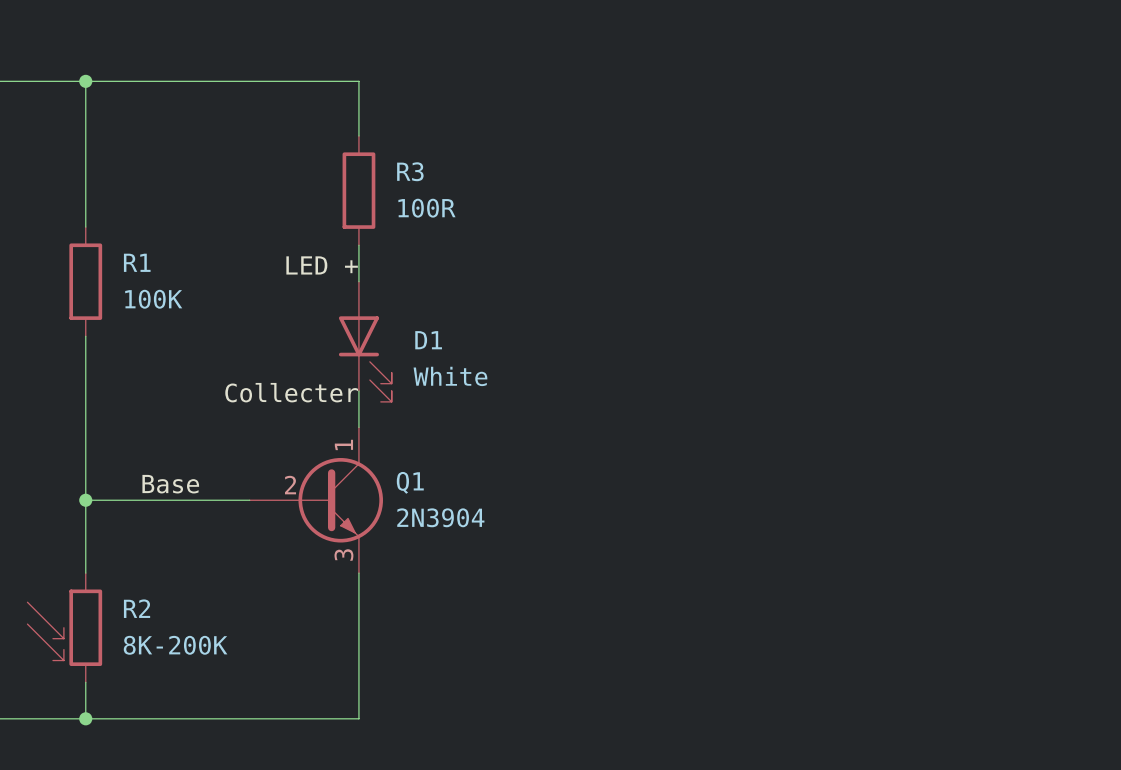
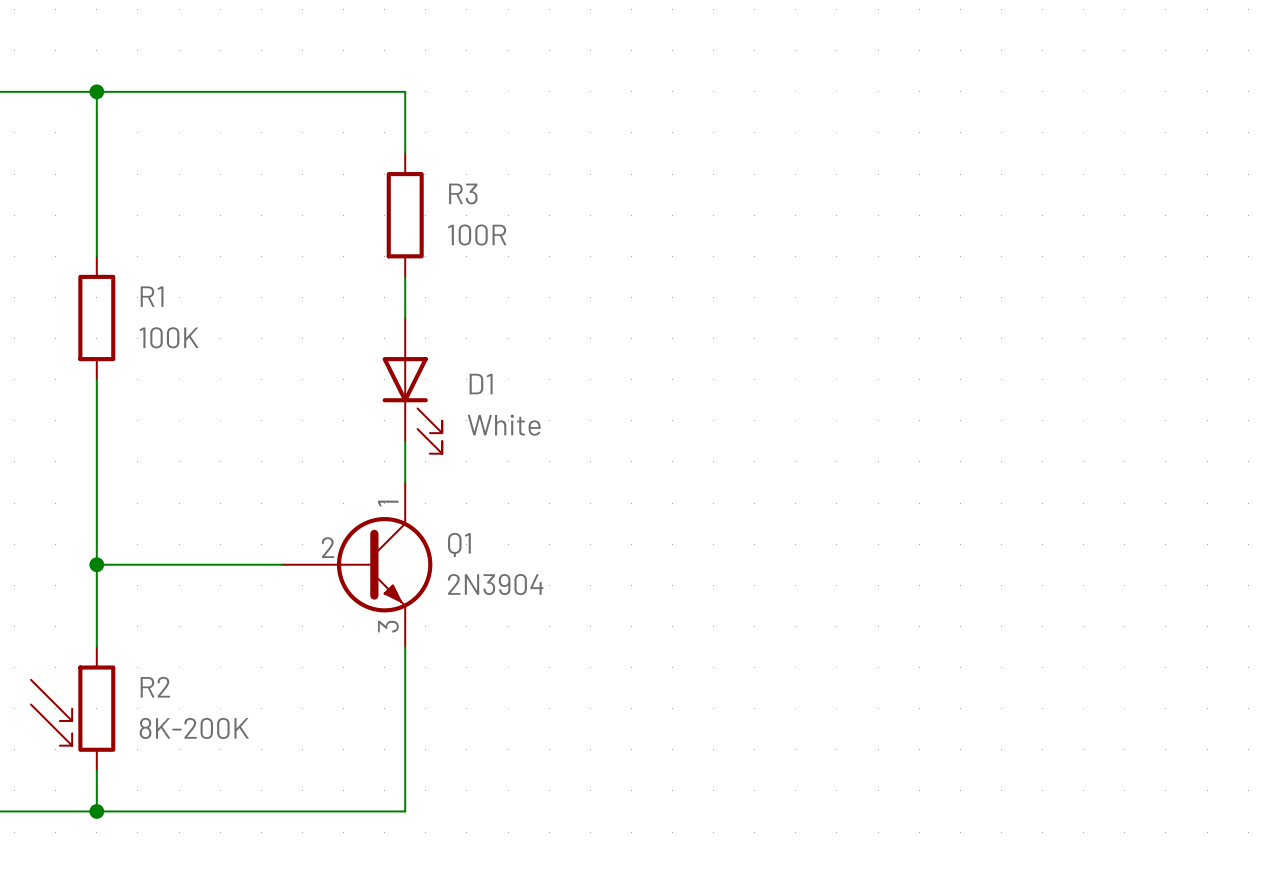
label: LED + (322, 265) -> none
label: Collecter (291, 392) -> none
label: Base (170, 484) -> none

